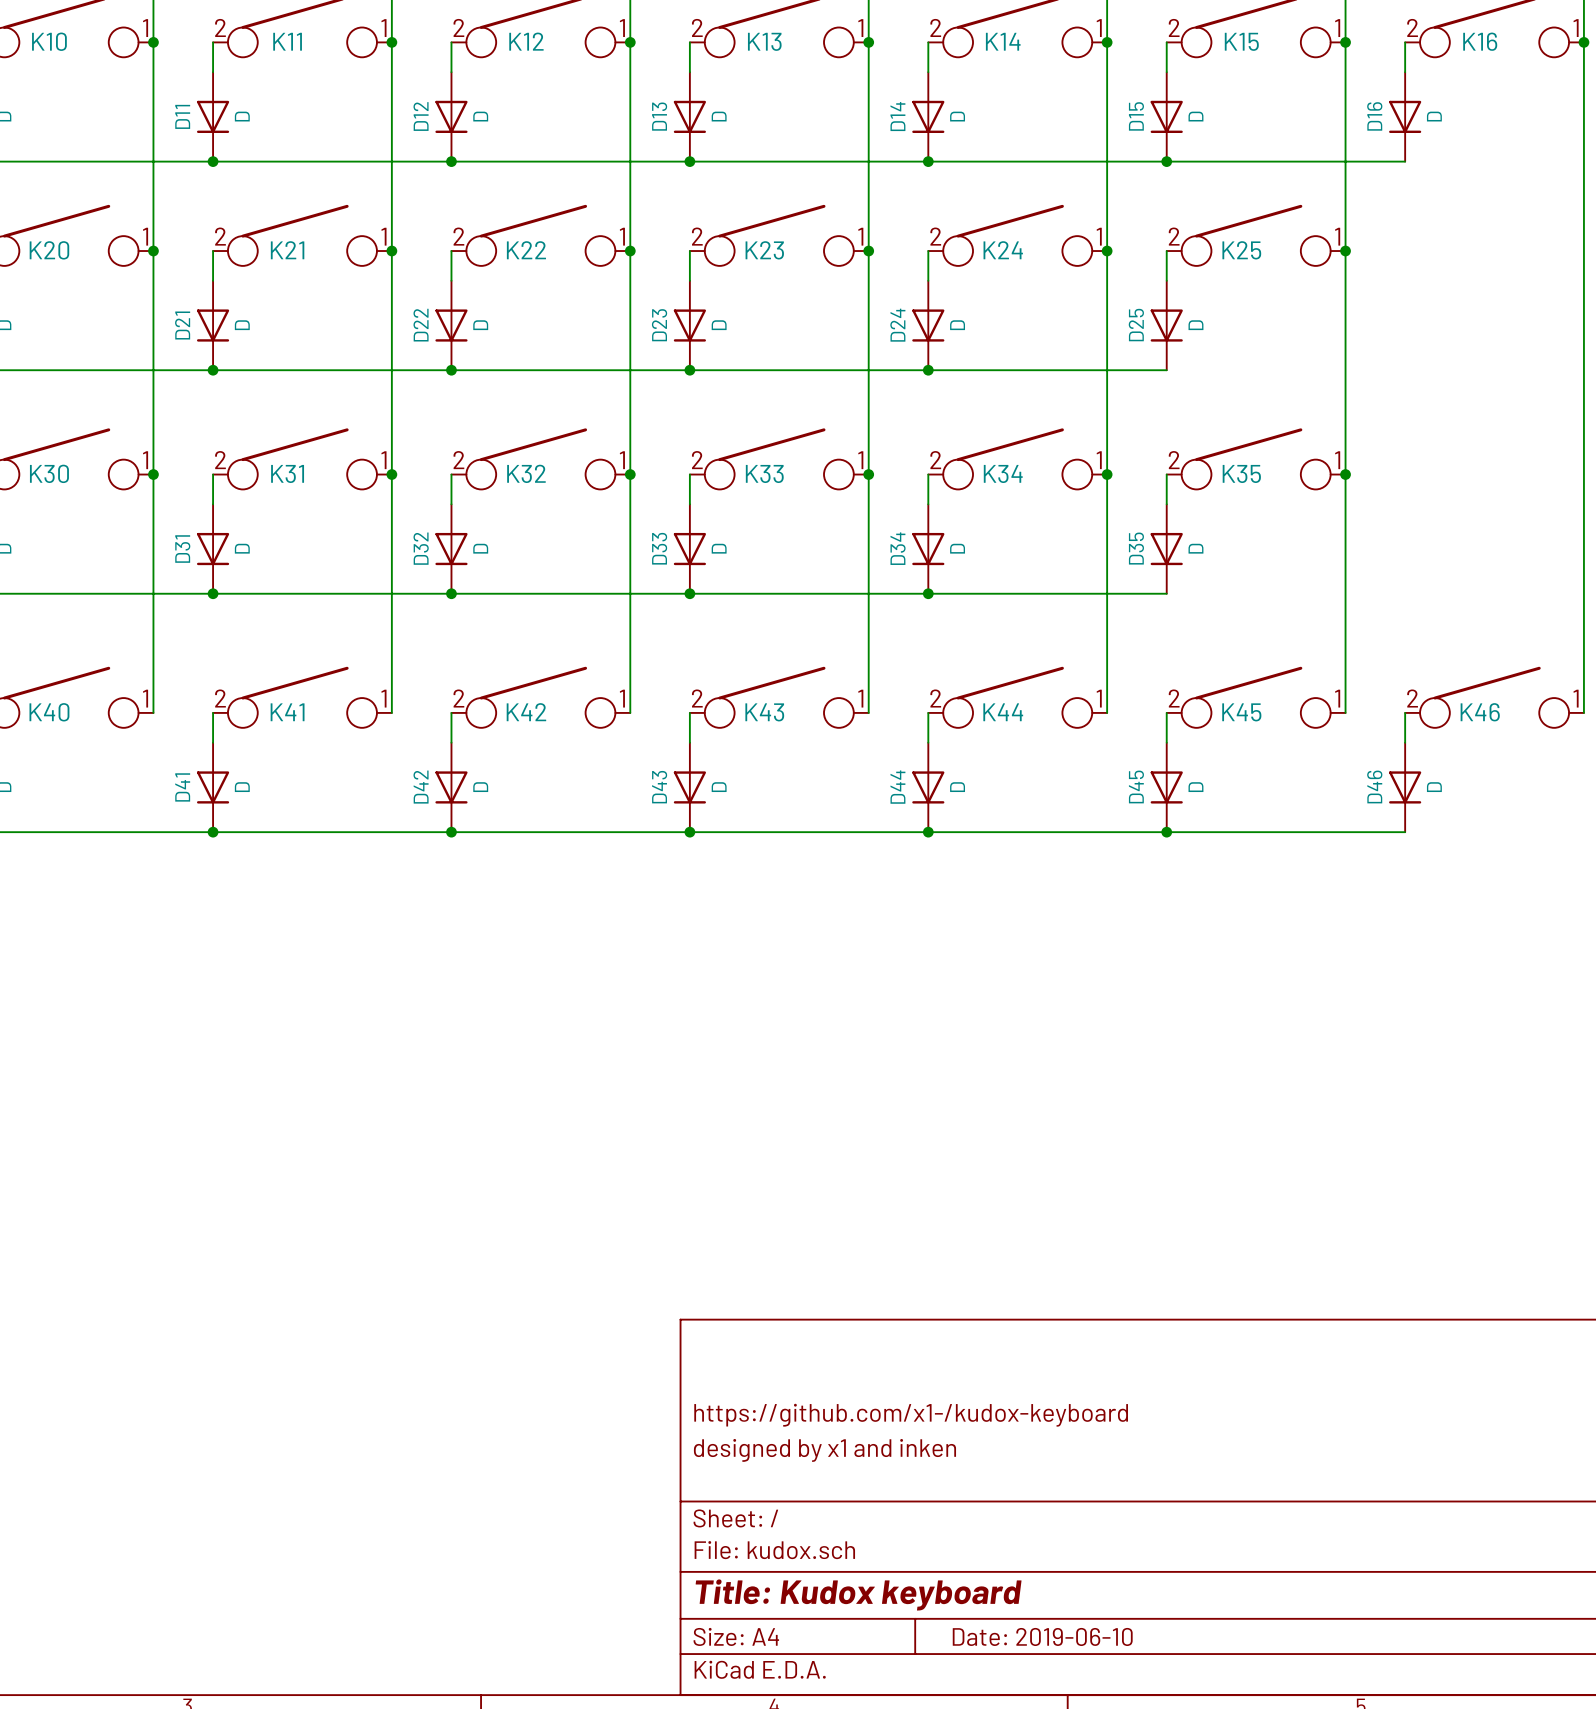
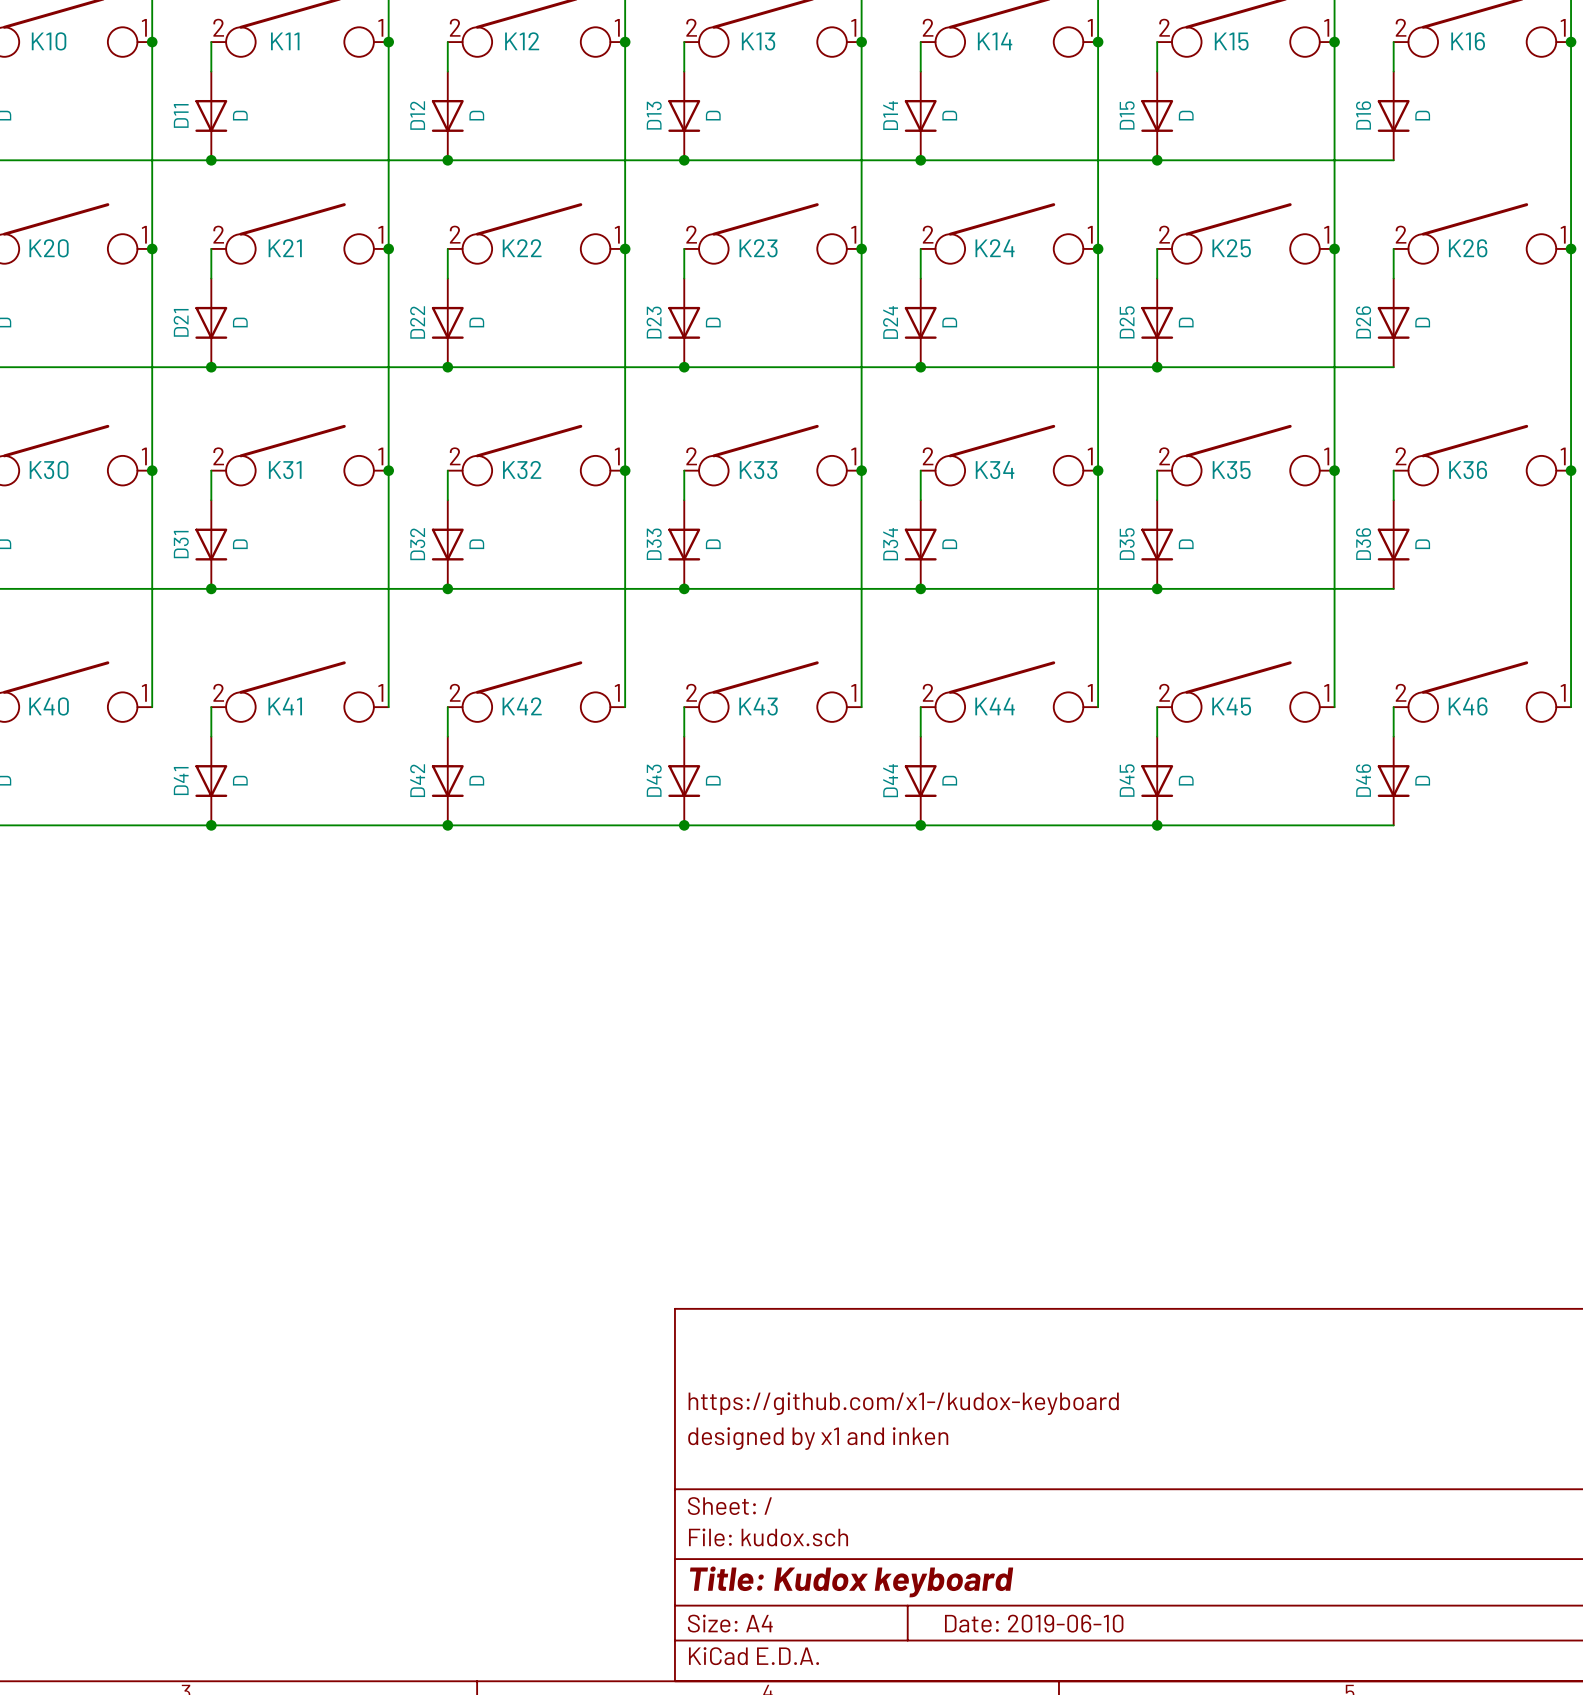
K26: none -> (1482, 233)
wire: none -> (1393, 248) (1393, 278)
junction: none -> (1571, 248)
D26: none -> D (1393, 322)
wire: none -> (1157, 367) (1393, 367)
junction: none -> (1157, 367)
K36: none -> (1482, 455)
wire: none -> (1393, 470) (1393, 500)
junction: none -> (1571, 470)
D36: none -> D (1393, 544)
wire: none -> (1157, 588) (1393, 588)
junction: none -> (1157, 588)

